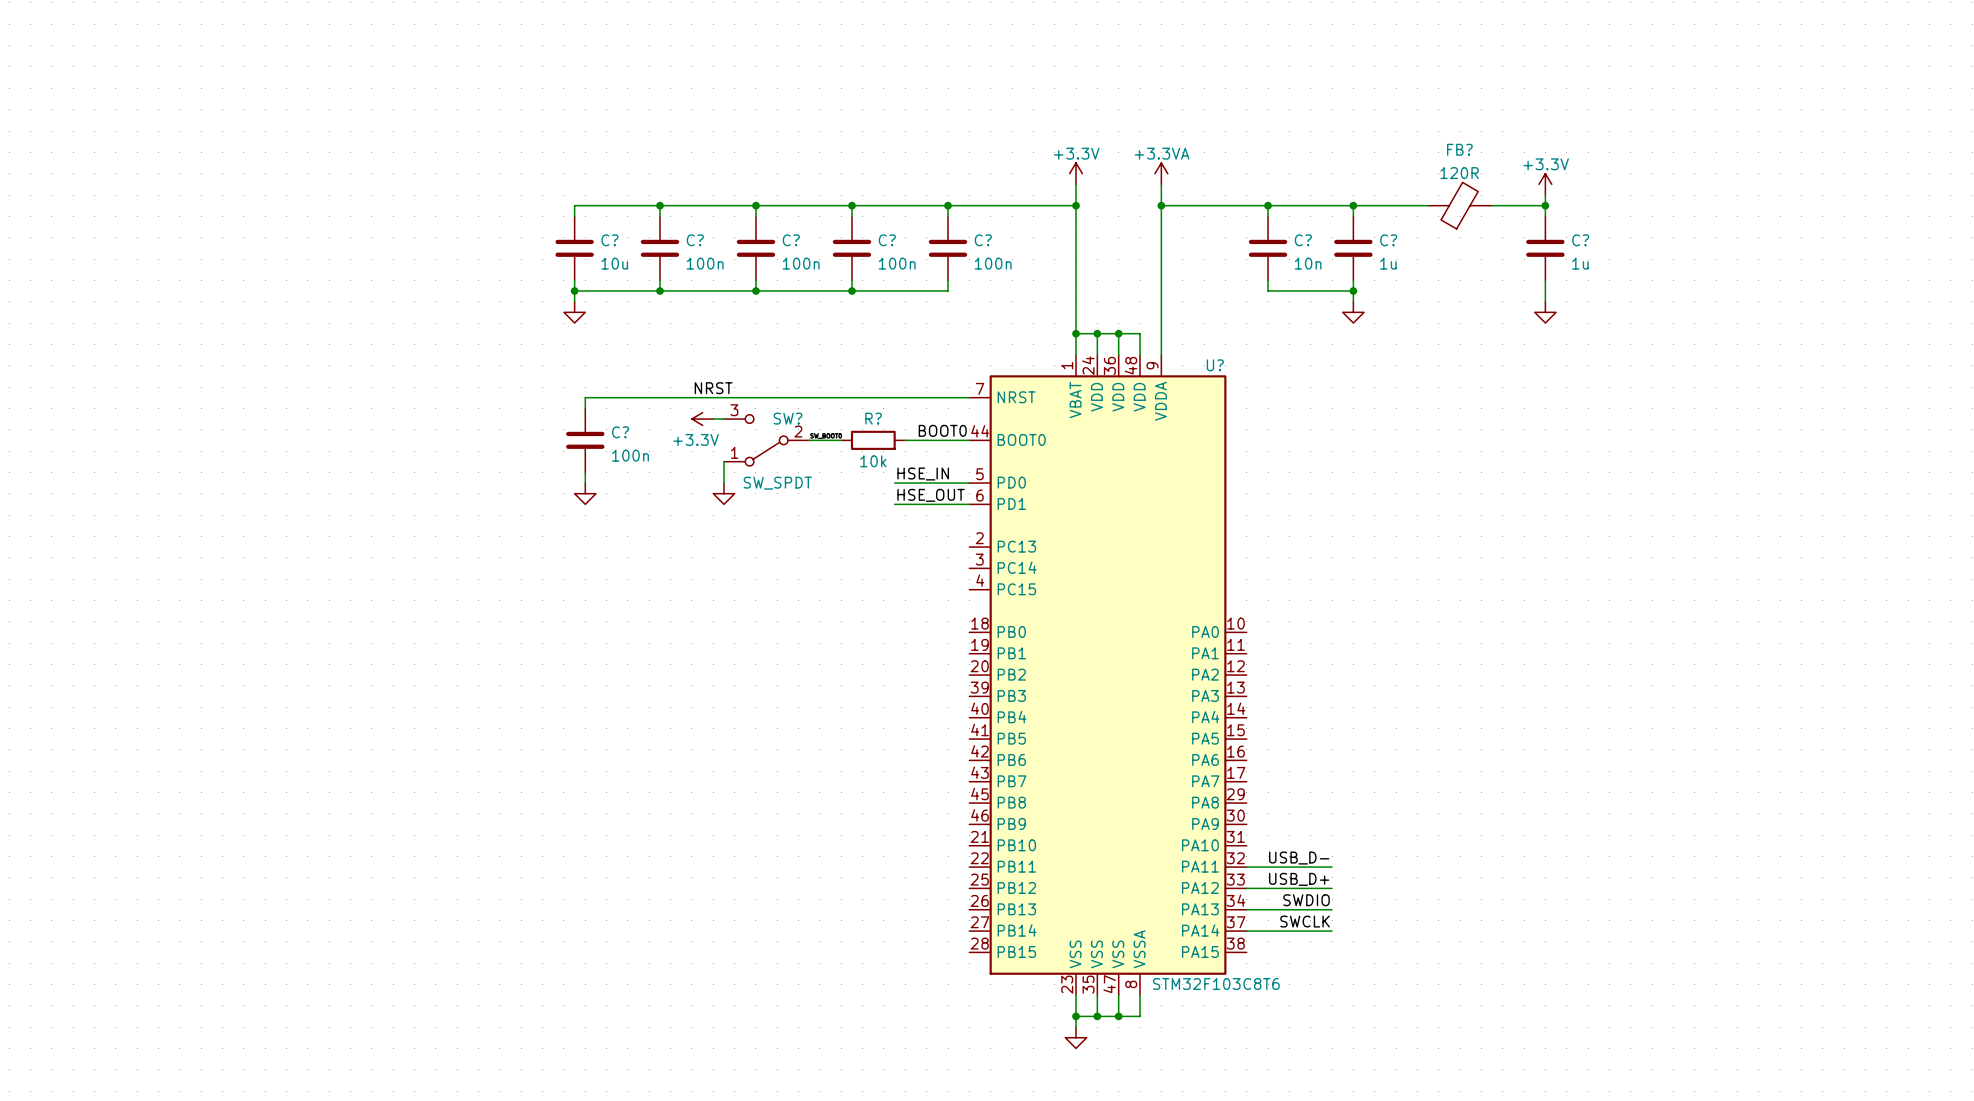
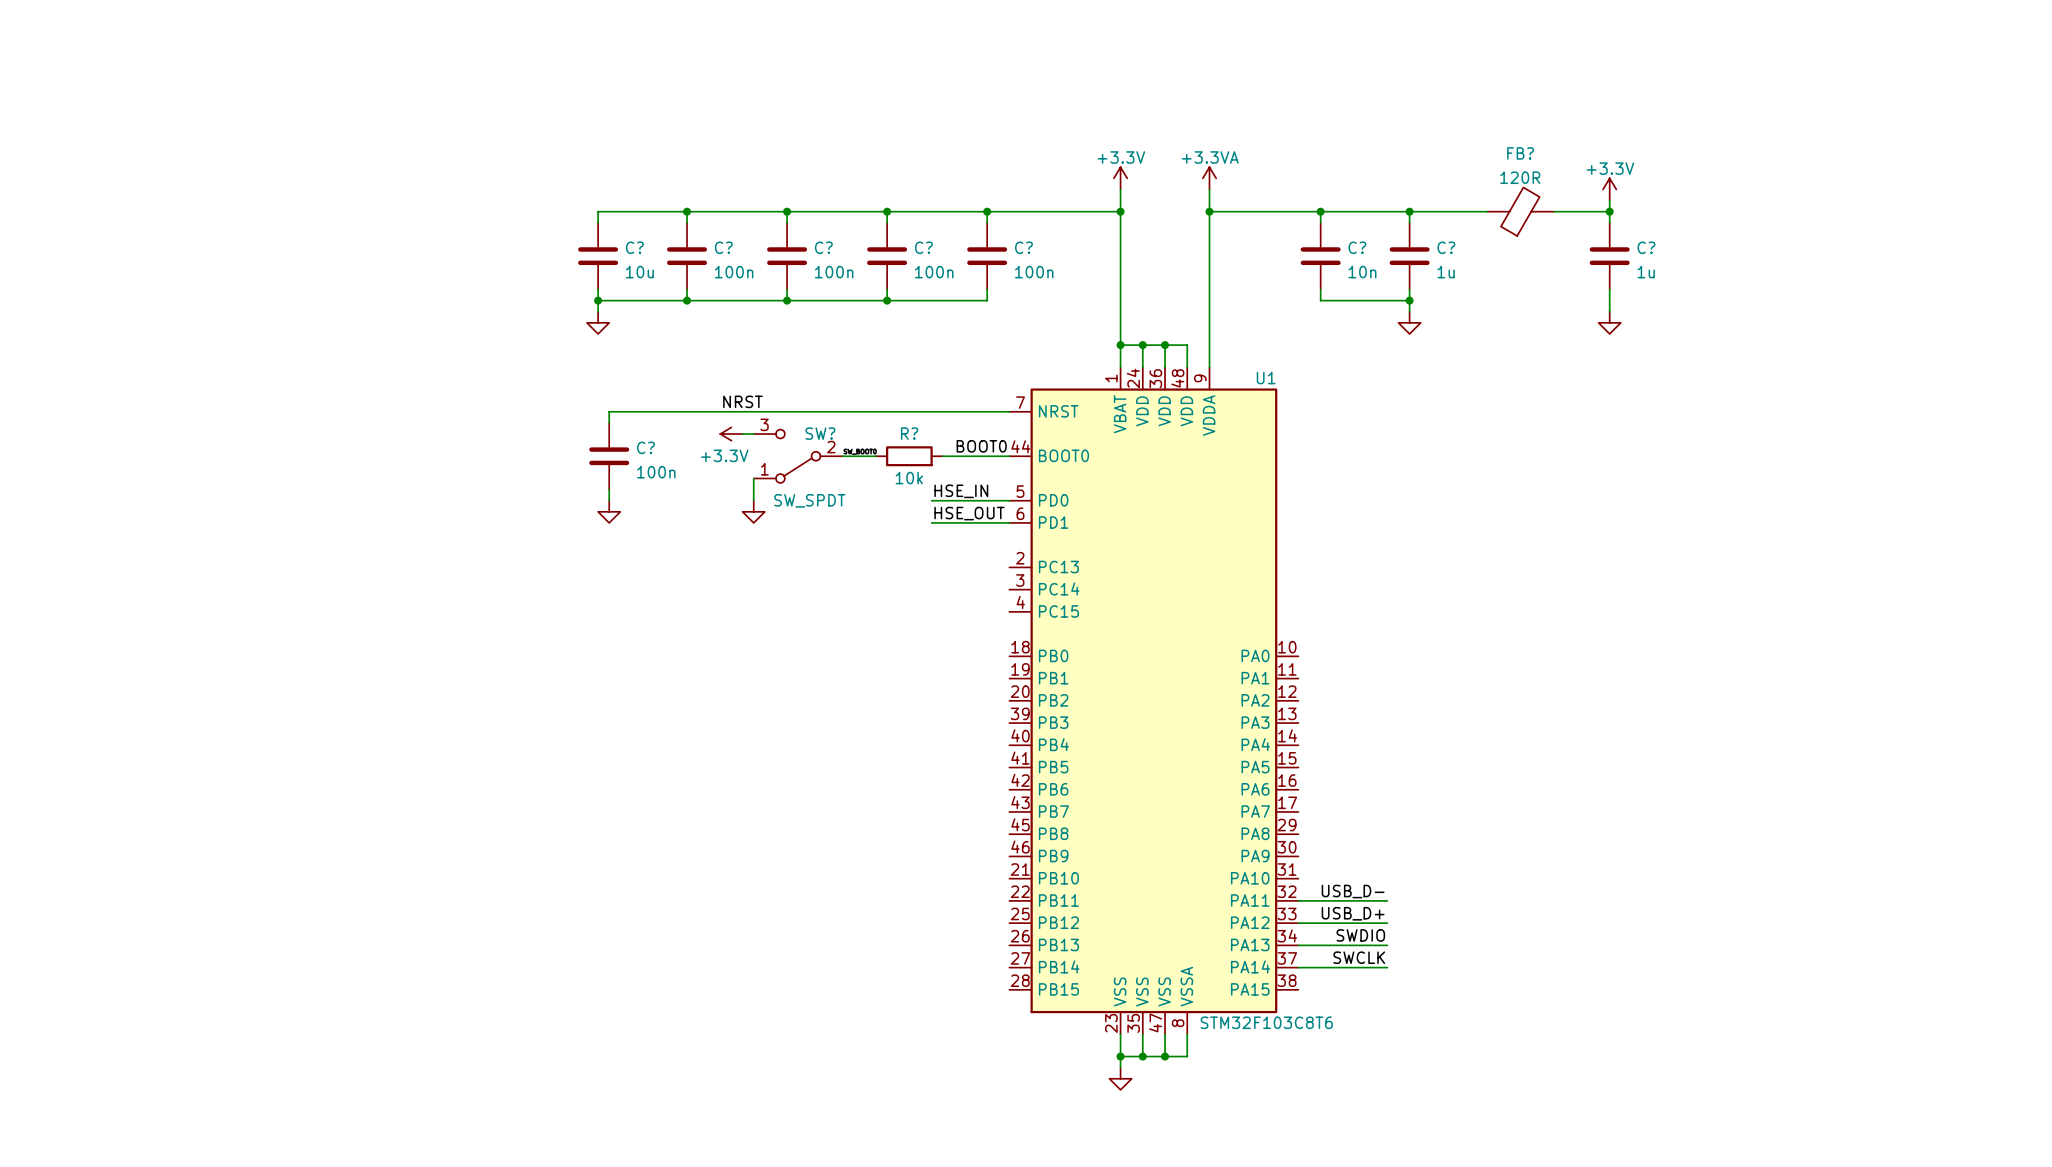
U? name: U? (1215, 365) -> U1 (1266, 378)

